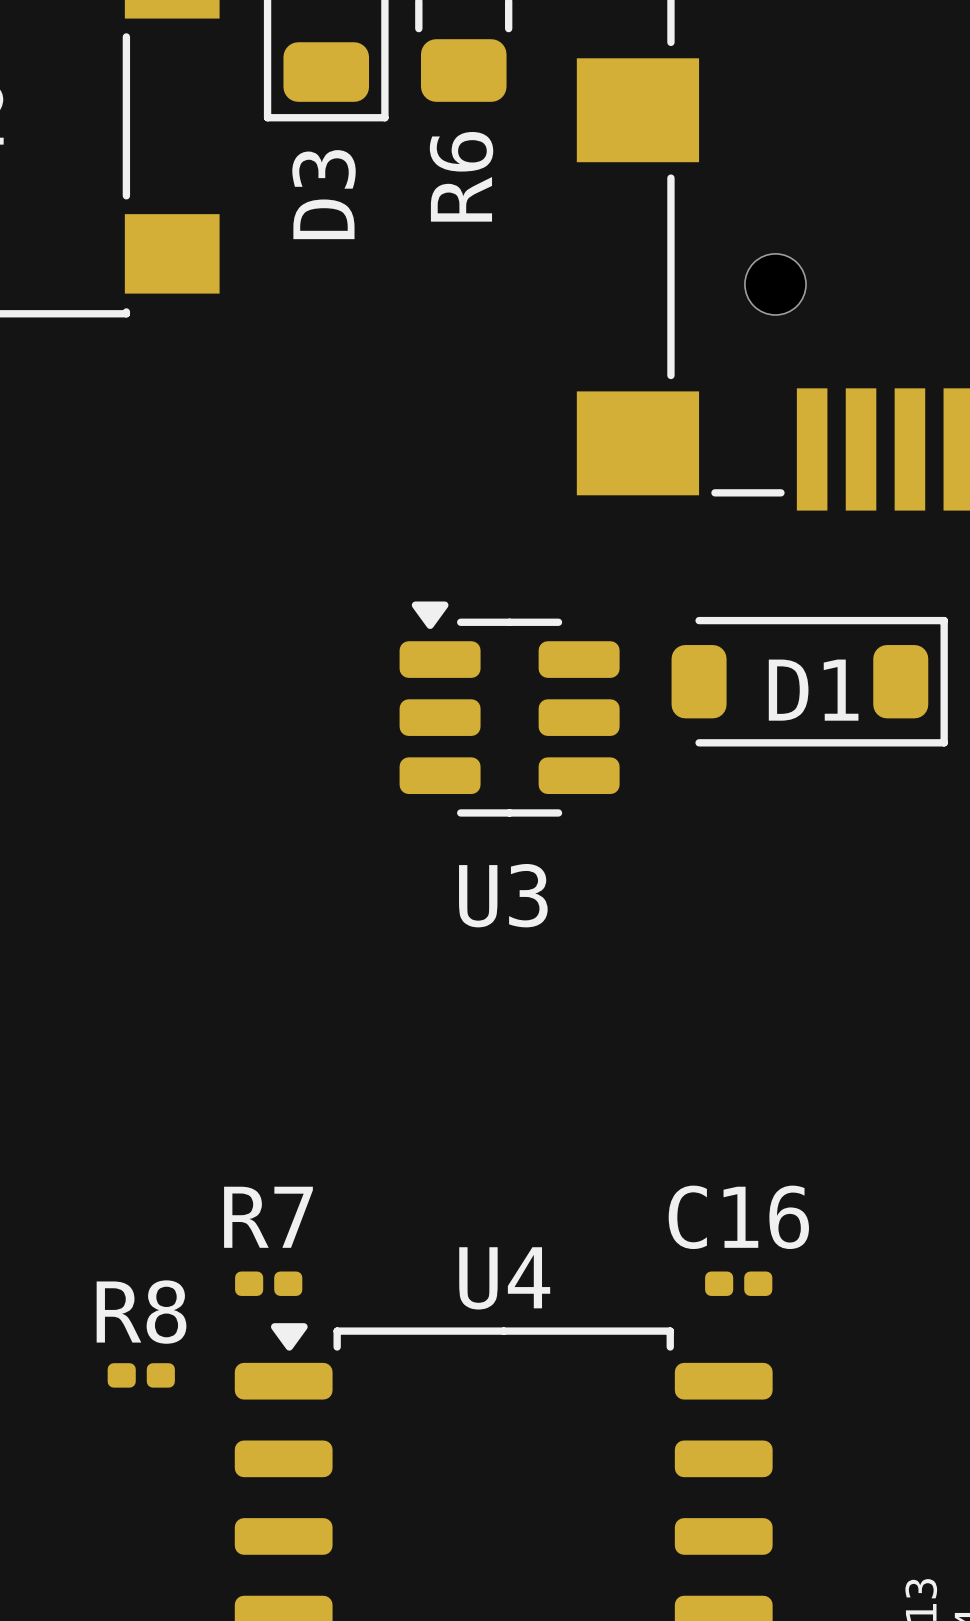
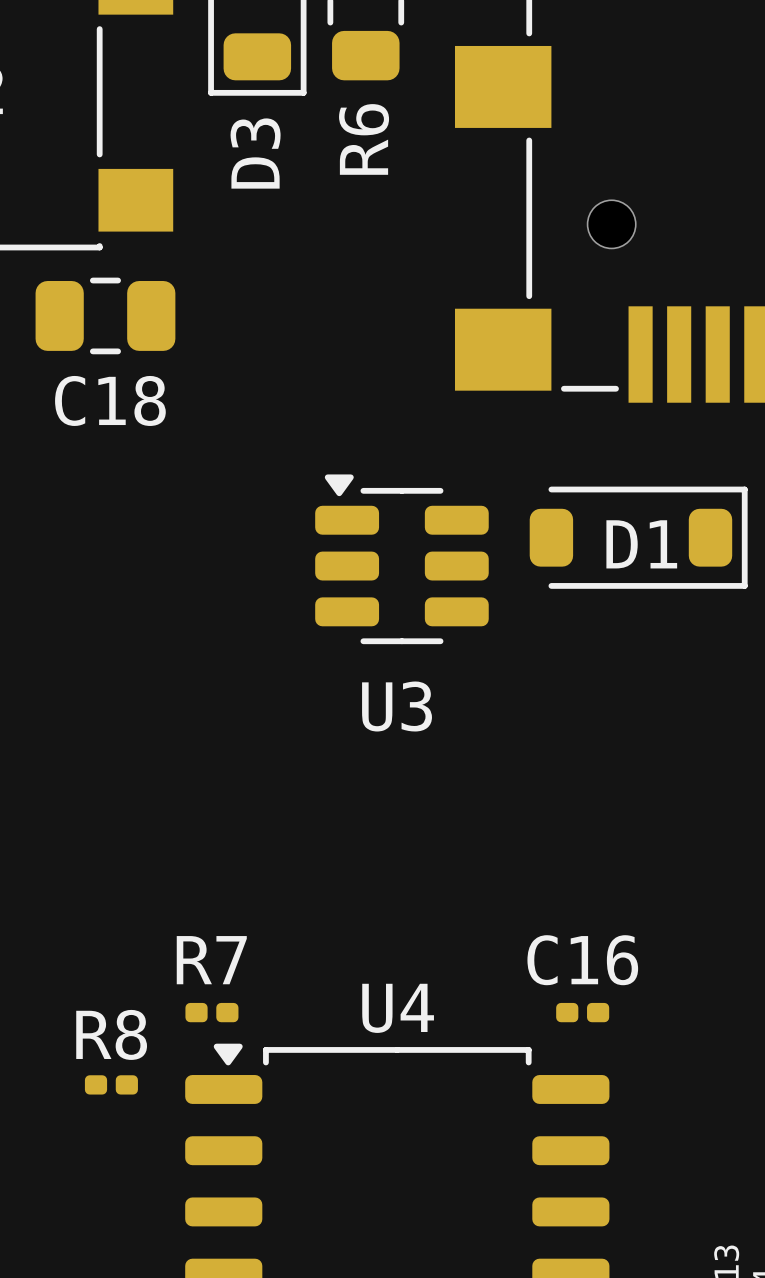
C18: none -> (105, 315)

